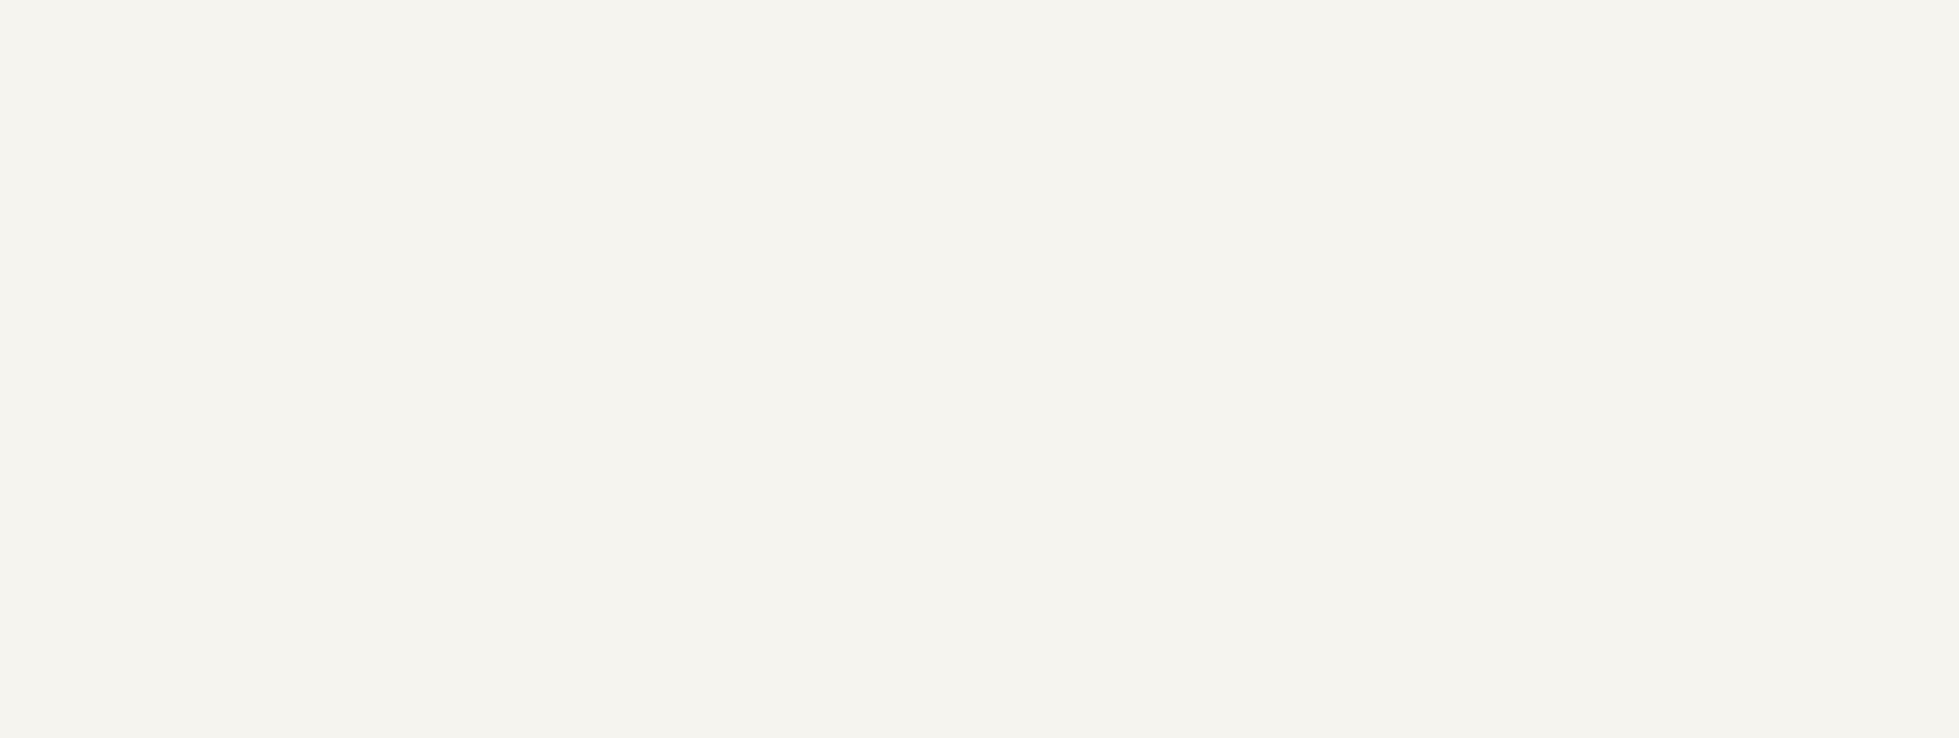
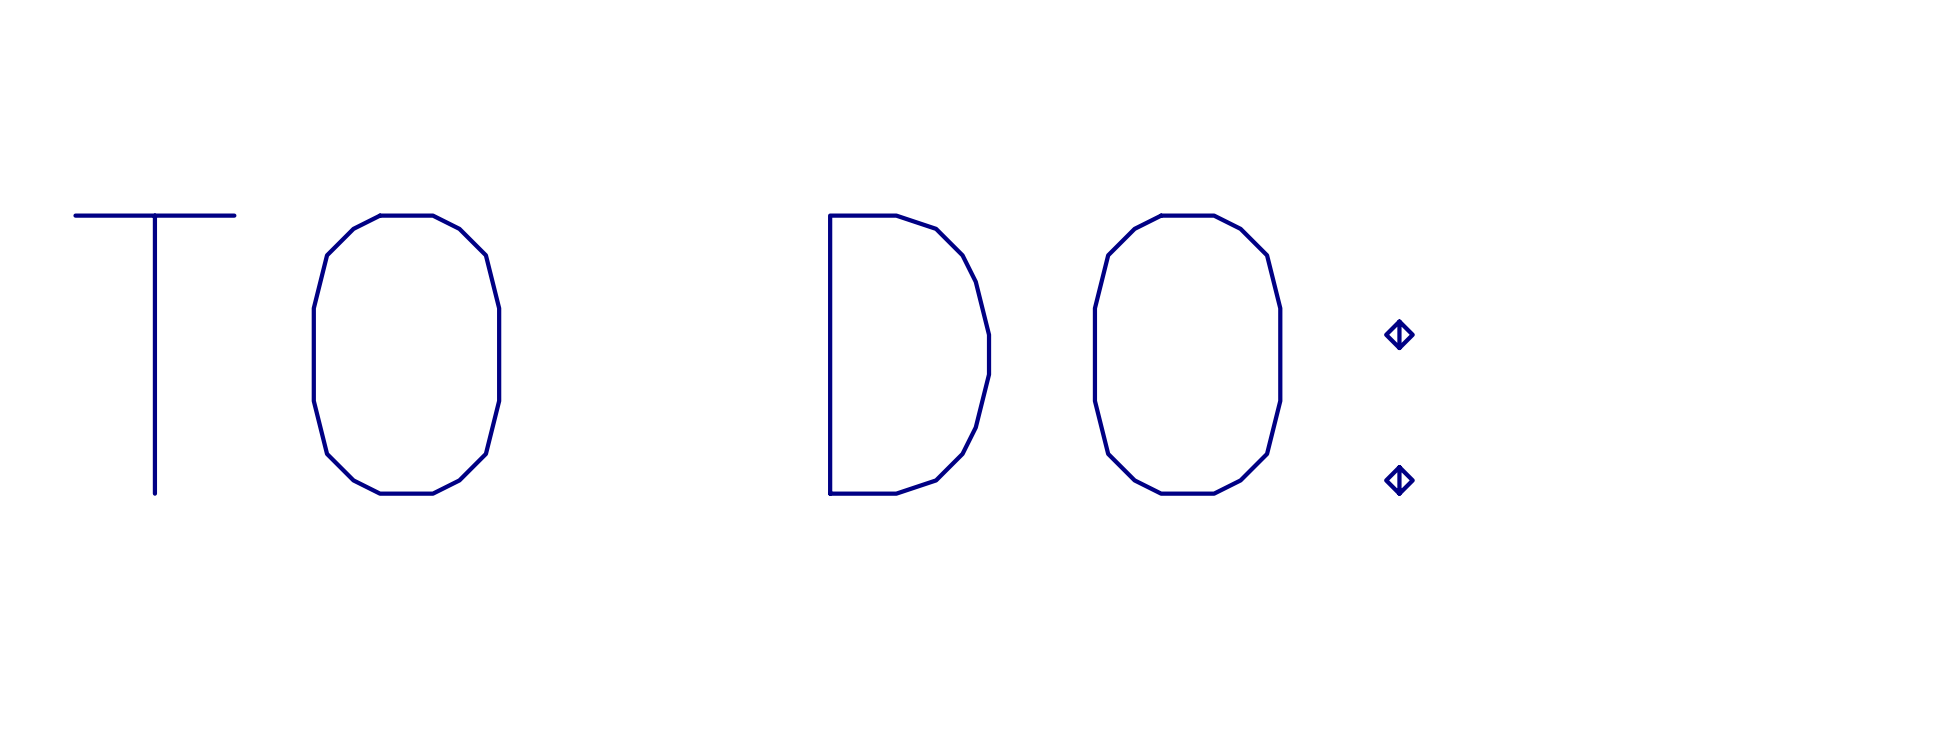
text: none -> TO DO: (744, 354)

